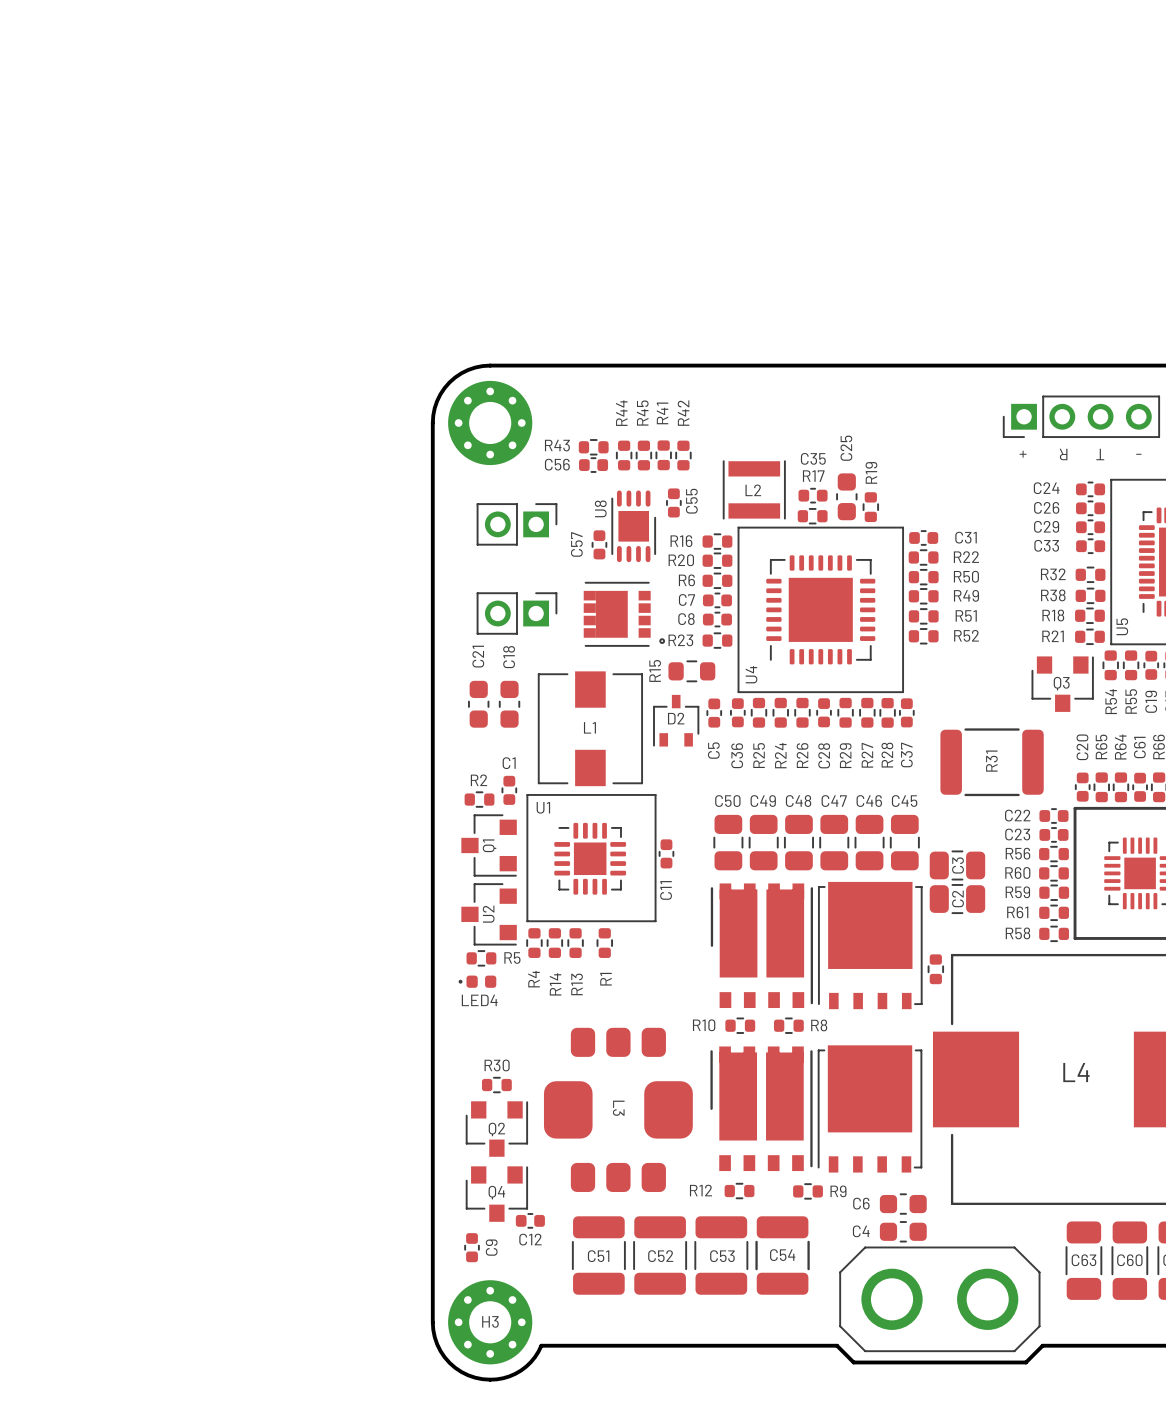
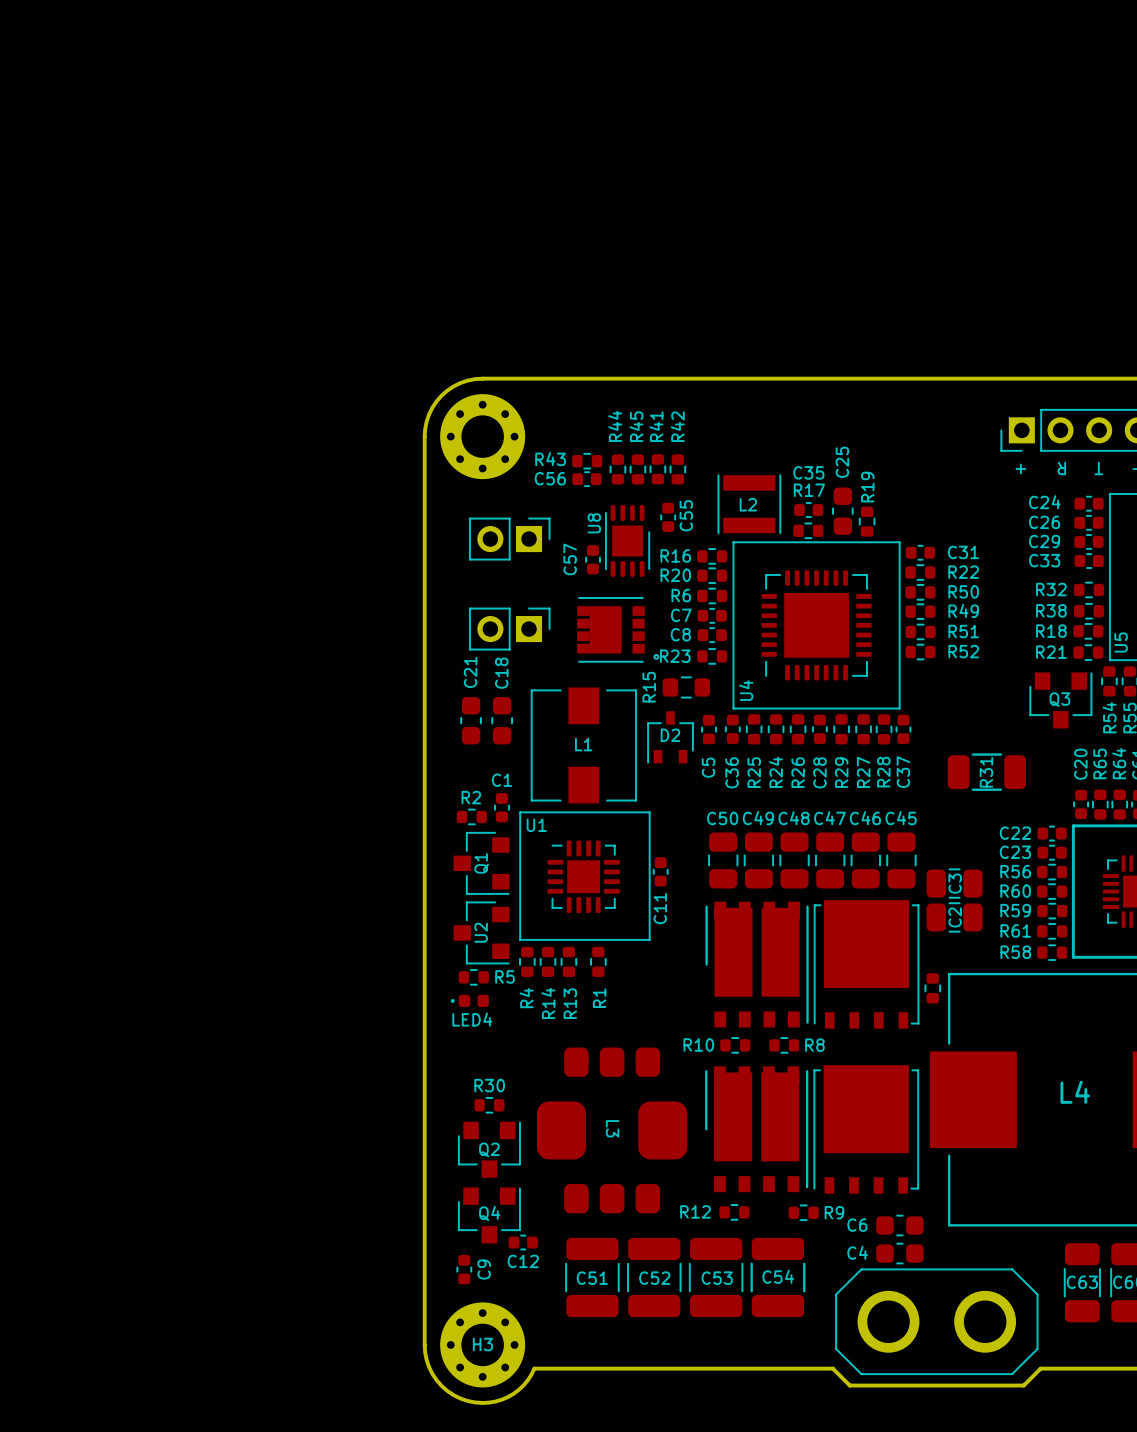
R31 footprint: [940, 728, 1044, 797] -> [947, 753, 1027, 791]

